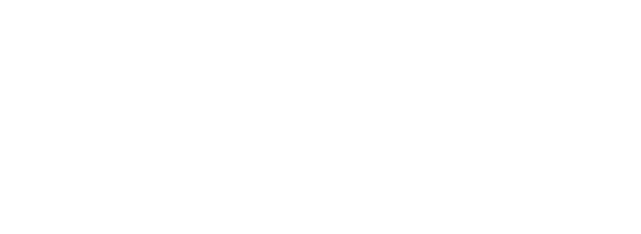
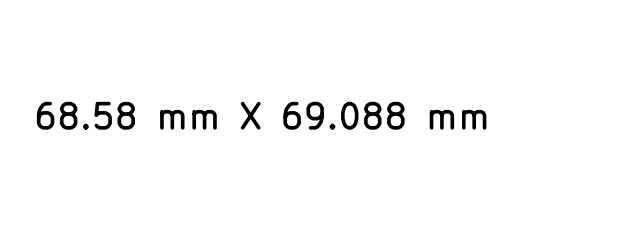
text: none -> 68.58 mm X 69.088 mm (261, 115)

